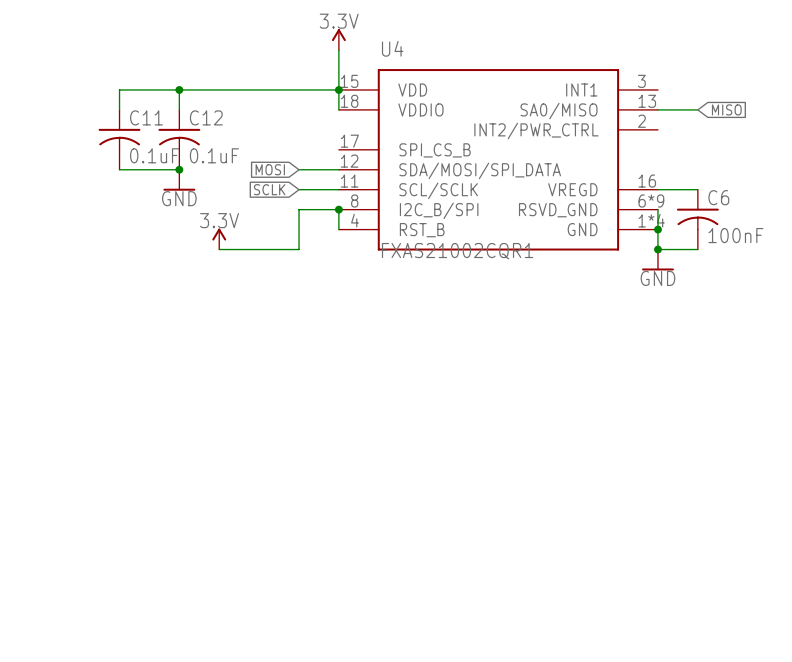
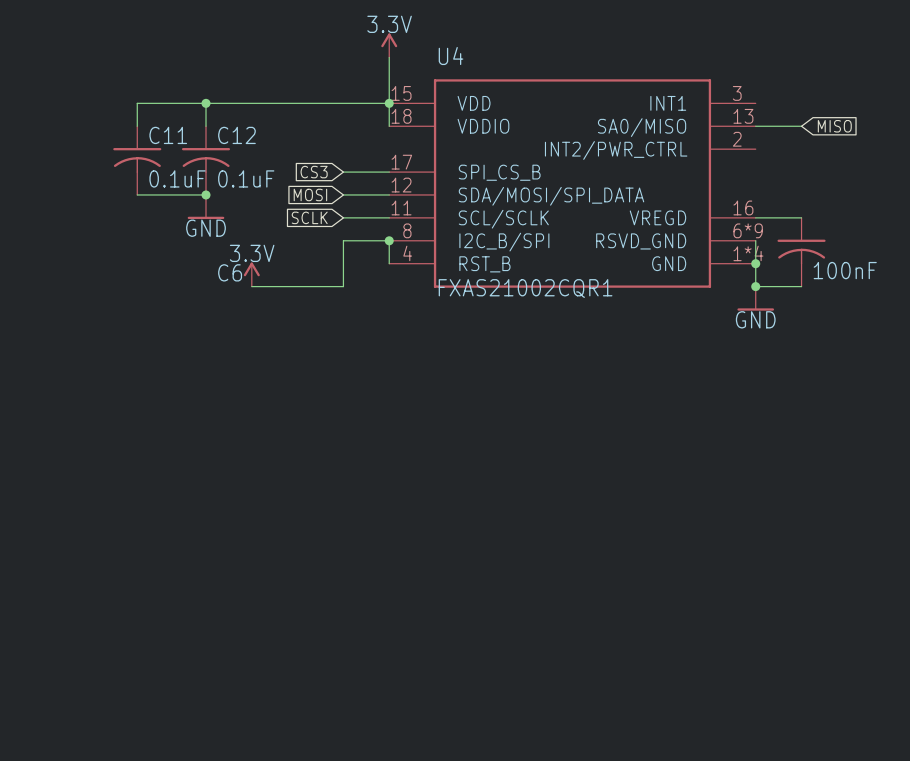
global label: none -> CS3 (314, 172)
wire: none -> (343, 172) (389, 172)
C6 name position: C6 (718, 197) -> C6 (230, 272)

